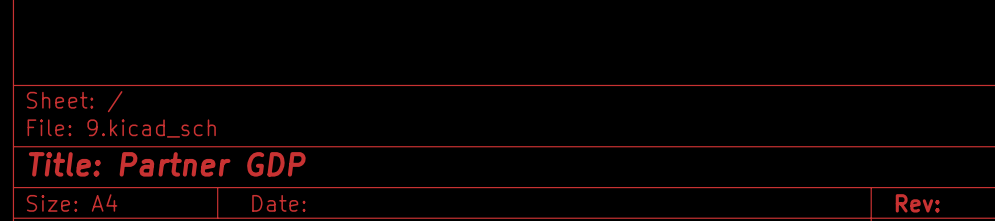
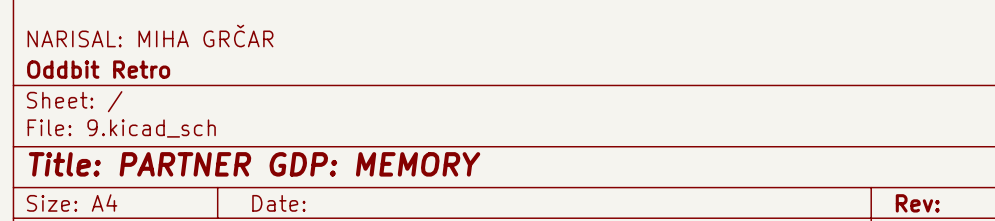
title block: none -> NARISAL: MIHA GRČAR (150, 36)
title block: none -> Oddbit Retro (98, 69)
title block: Title: Partner GDP (167, 164) -> Title: PARTNER GDP: MEMORY (254, 164)

